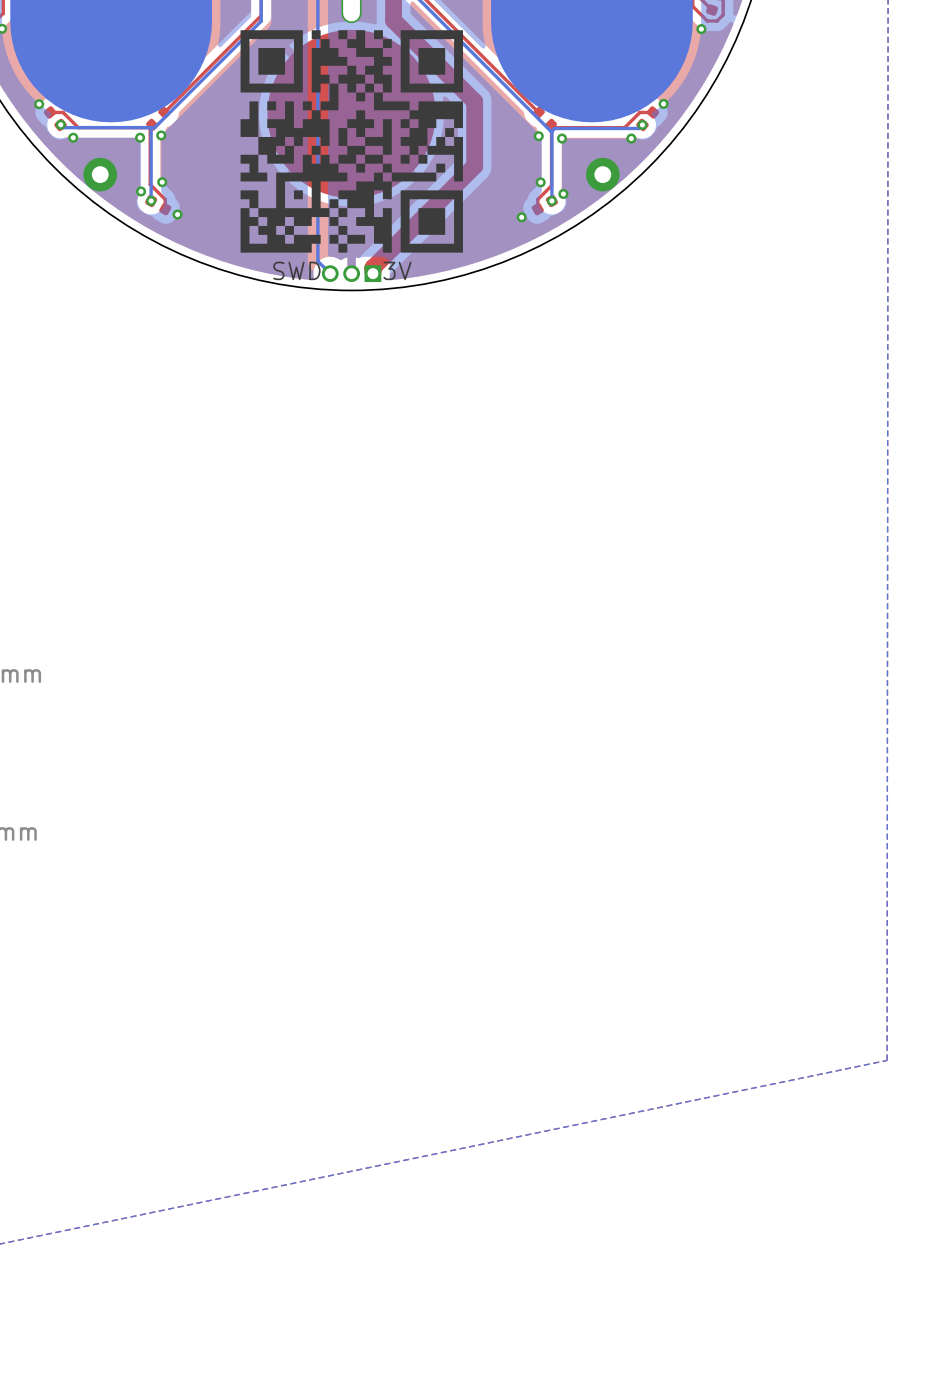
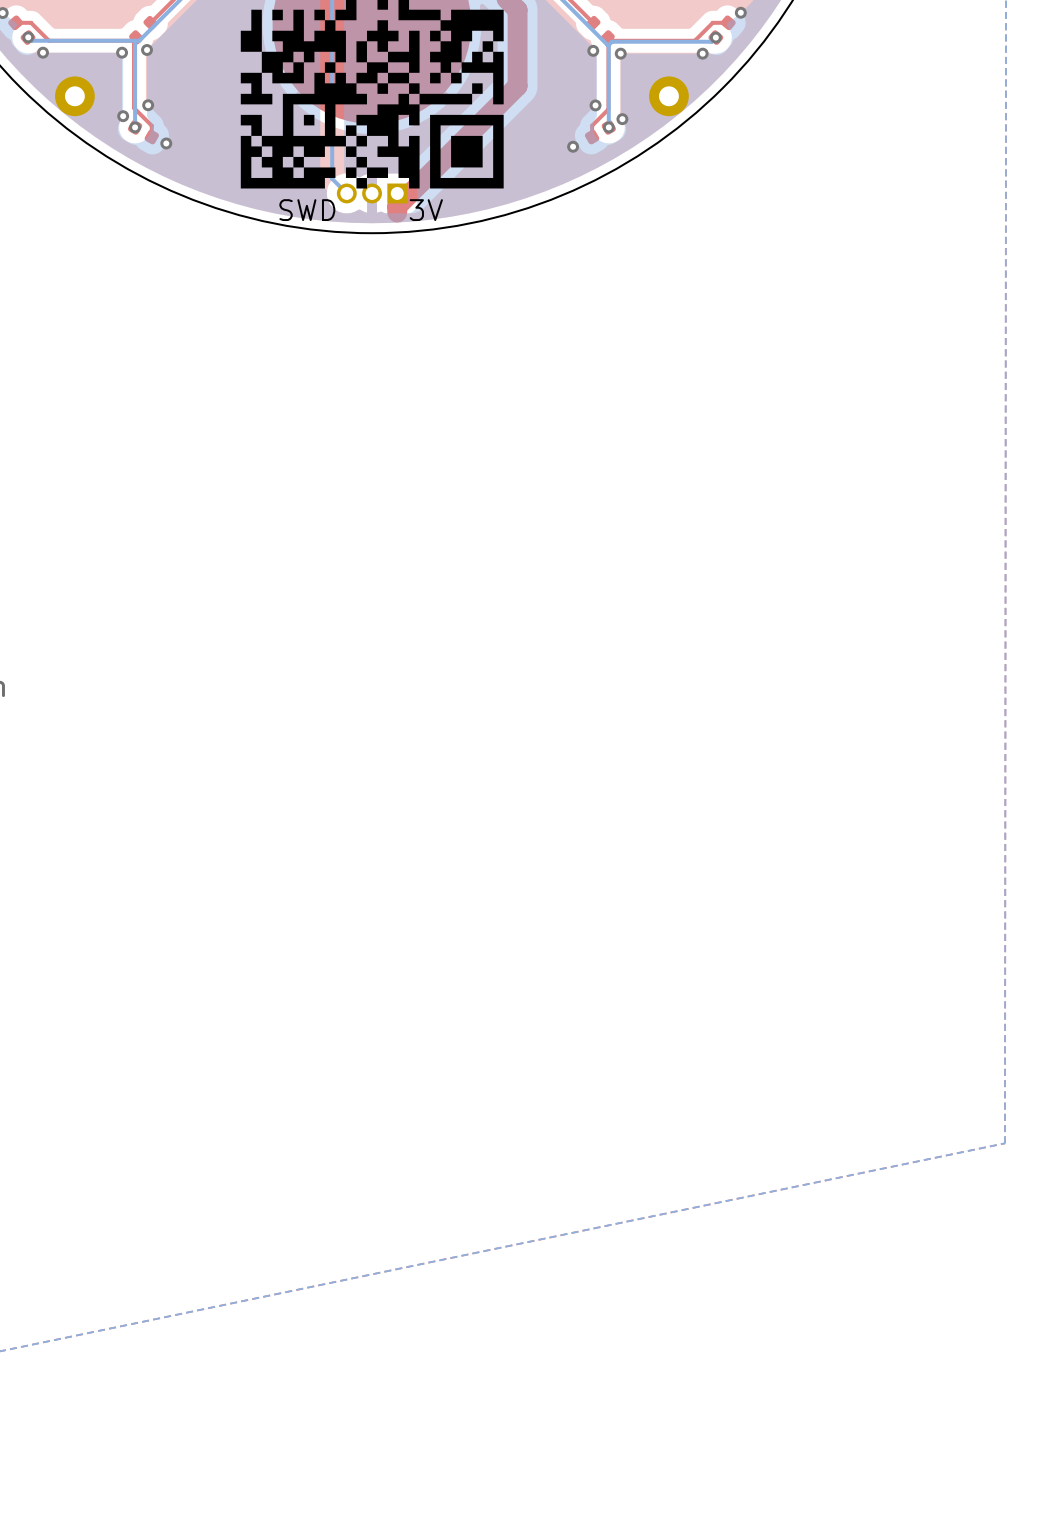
bottom track: (317, 244) (317, 261) (330, 273) -> (332, 178) (346, 193)
part position: (351, 273) -> (372, 193)

